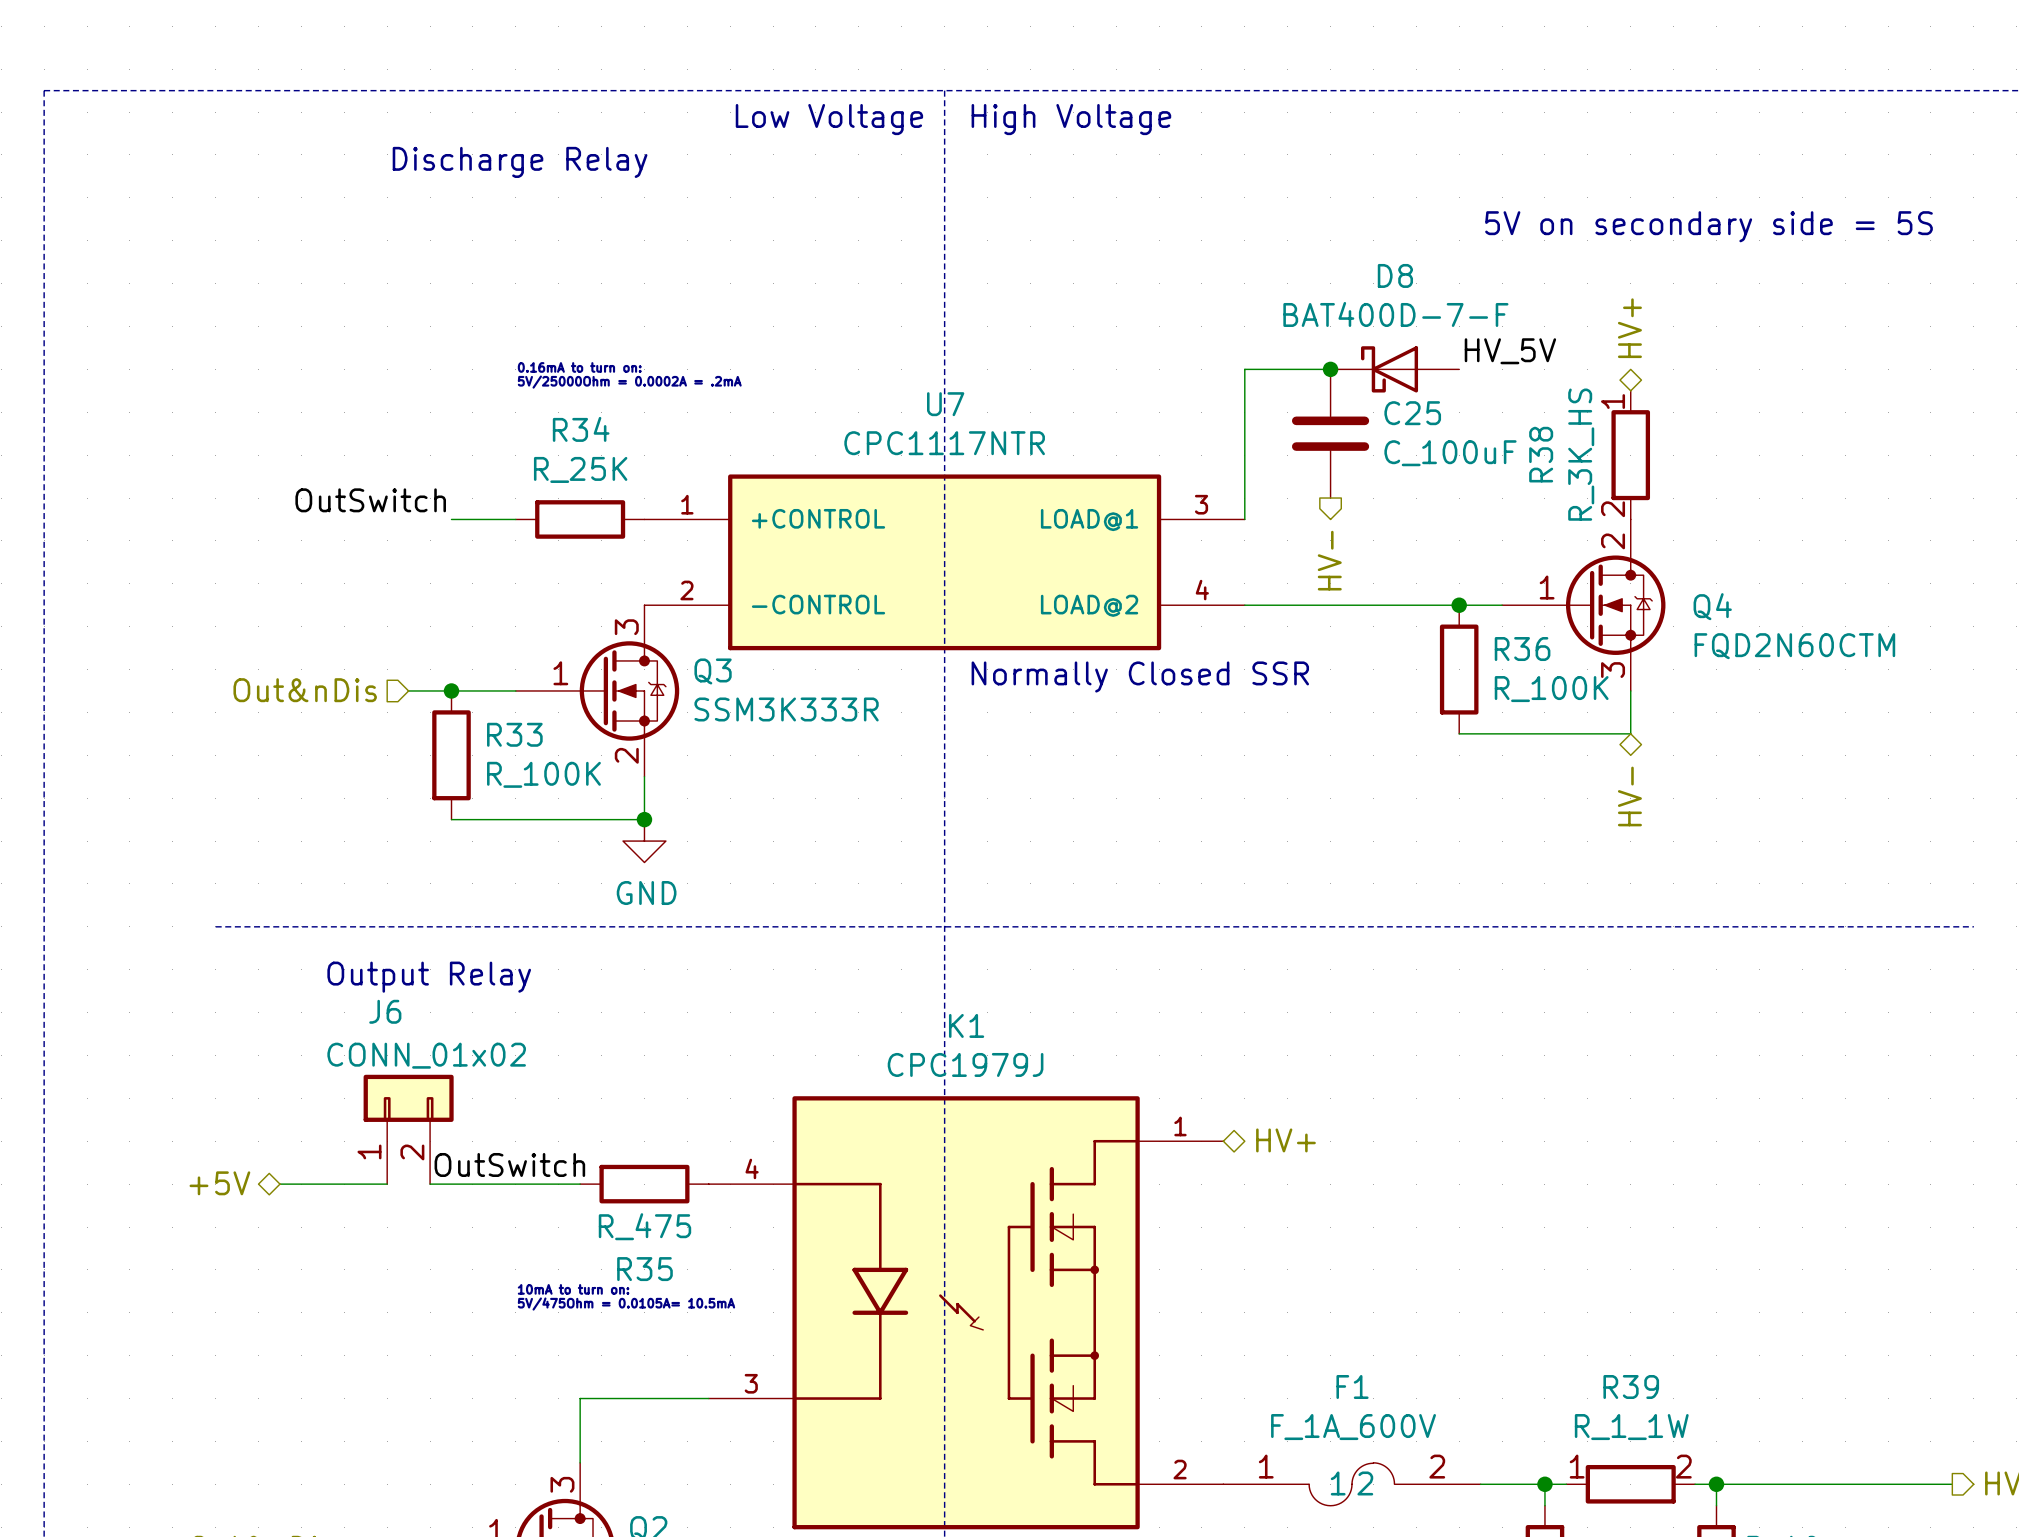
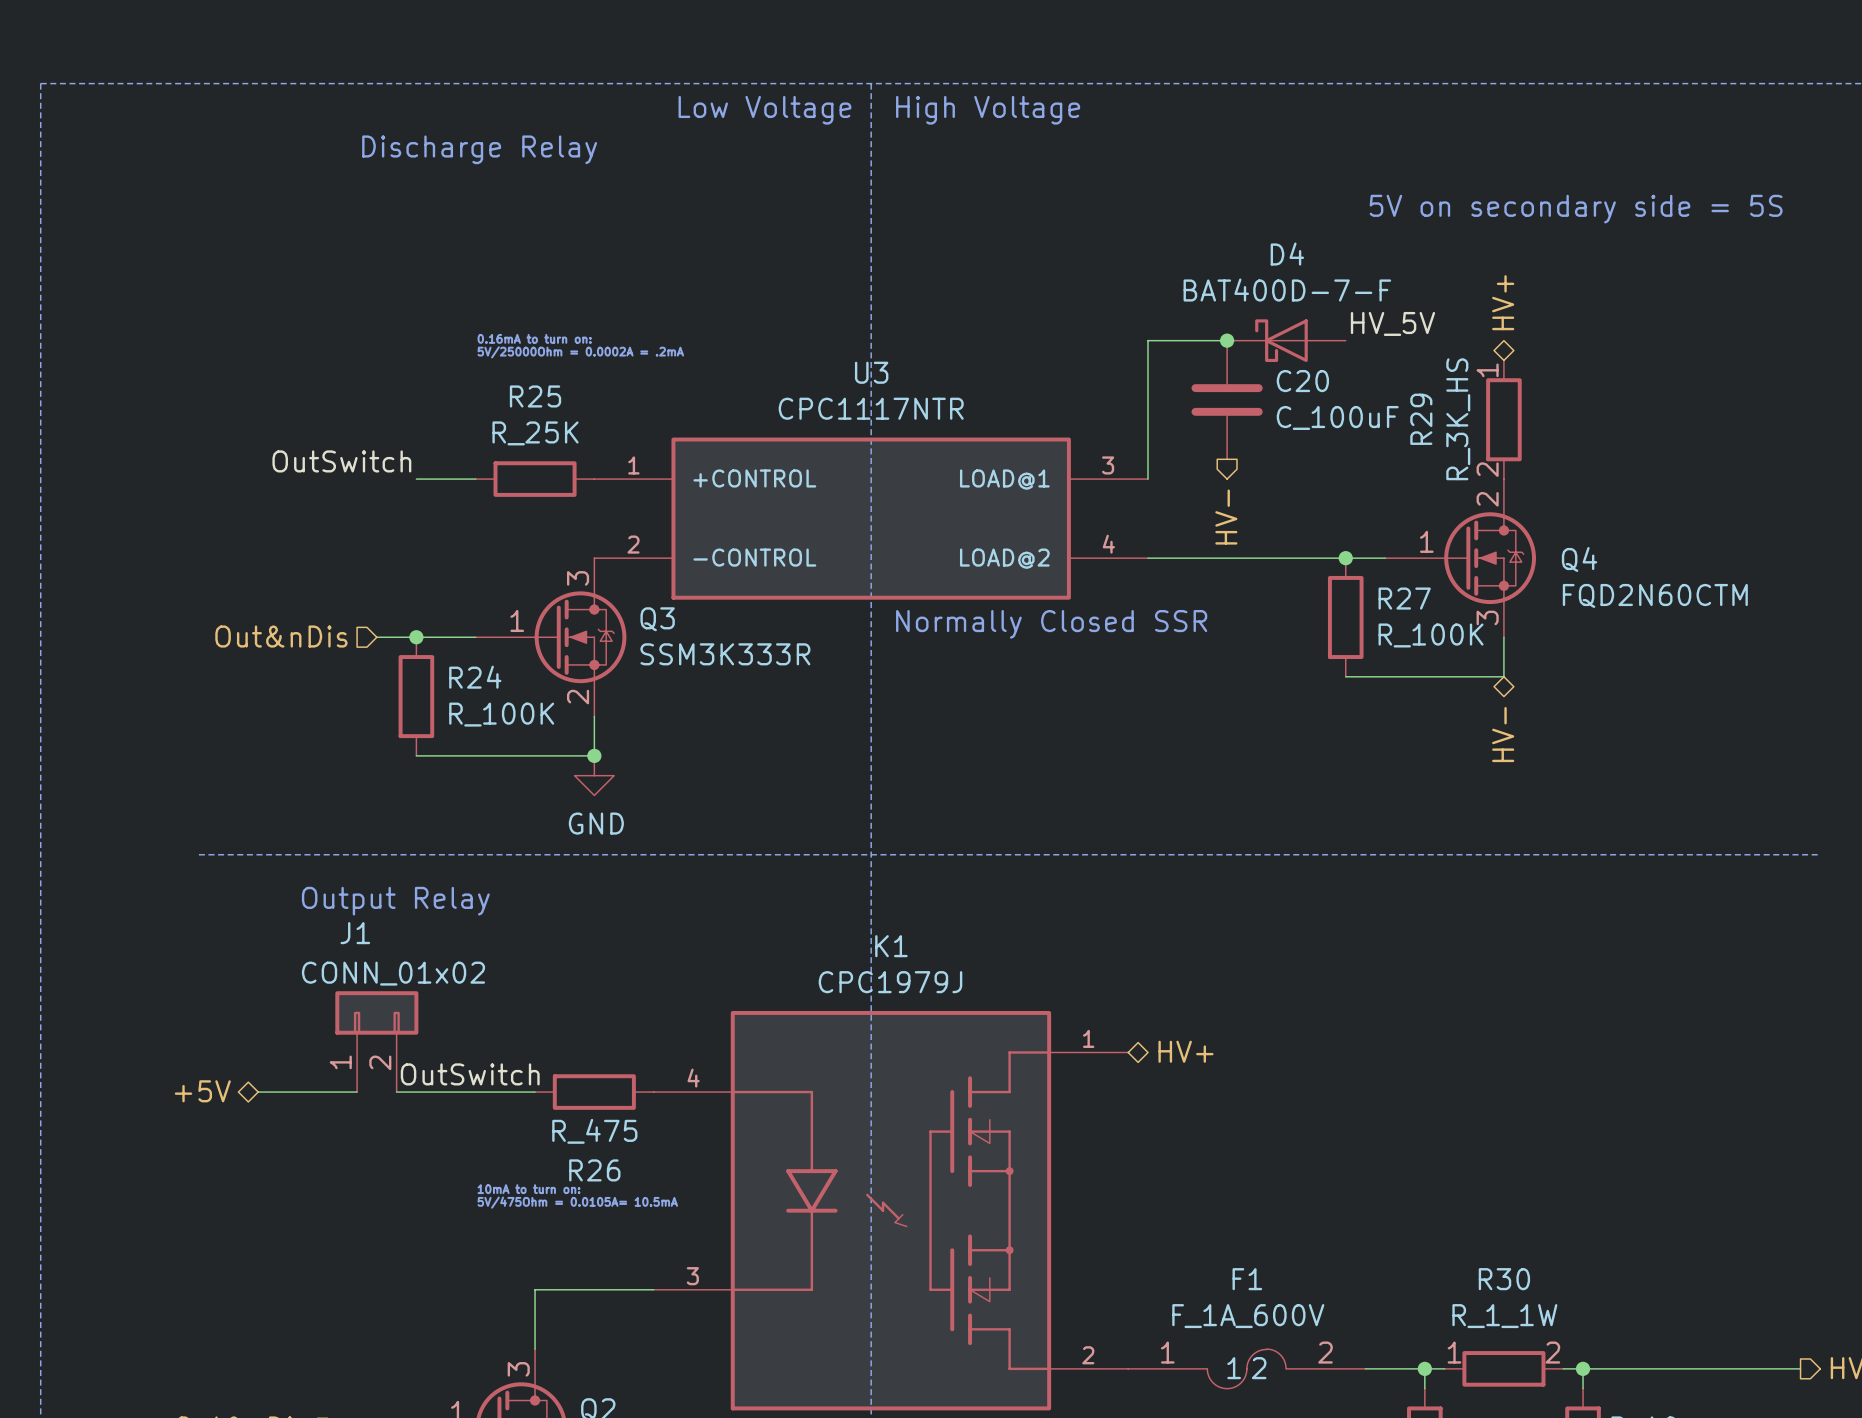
D8 name: D8 (1395, 275) -> D4 (1287, 254)
U7 name: U7 (945, 404) -> U3 (871, 372)
C25 name: C25 (1412, 413) -> C20 (1302, 381)
R34 name: R34 (581, 429) -> R25 (535, 396)
R38 name: R38 (1541, 454) -> R29 (1421, 419)
R36 name: R36 (1522, 649) -> R27 (1404, 598)
R33 name: R33 (514, 734) -> R24 (475, 677)
J6 name: J6 (385, 1011) -> J1 (355, 933)
R35 name: R35 (644, 1269) -> R26 (594, 1170)
R39 name: R39 (1631, 1387) -> R30 (1504, 1279)

